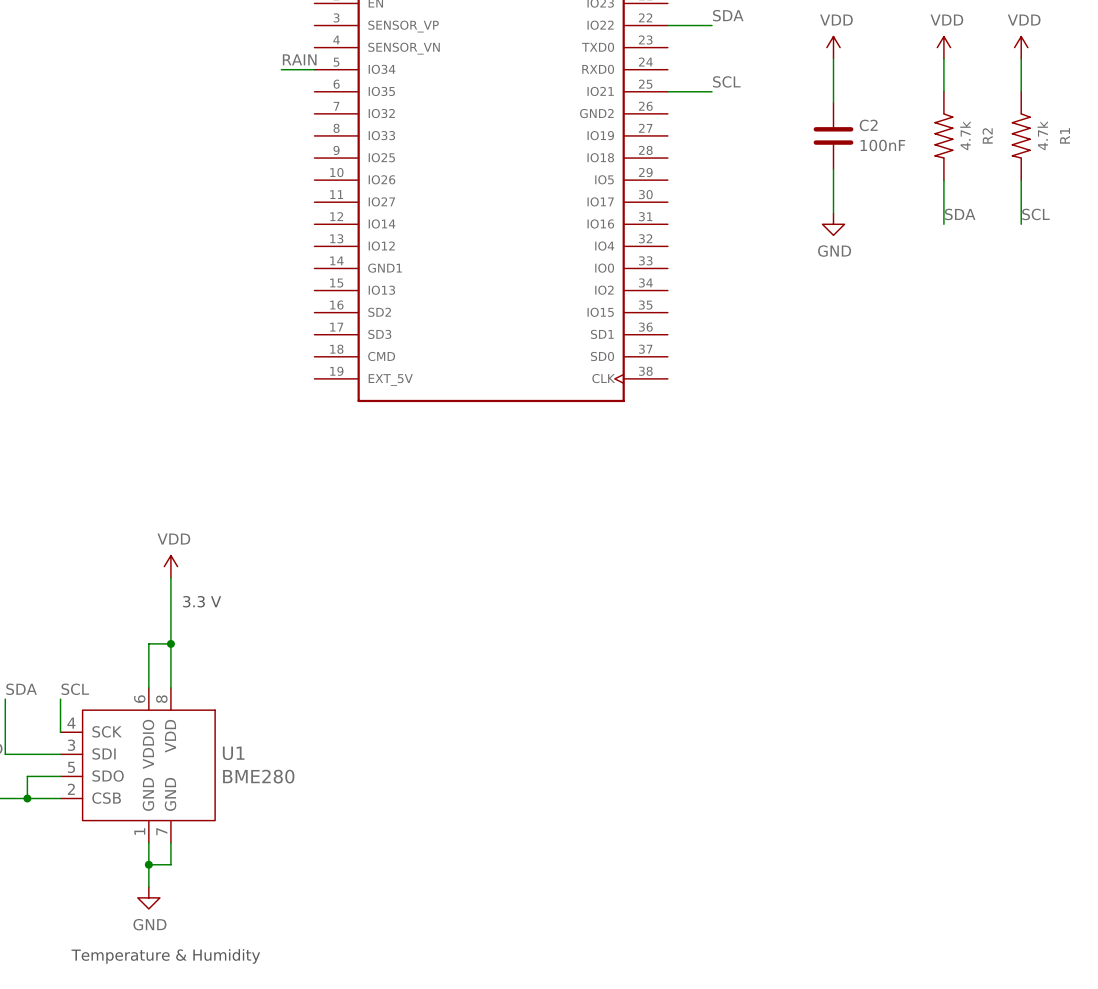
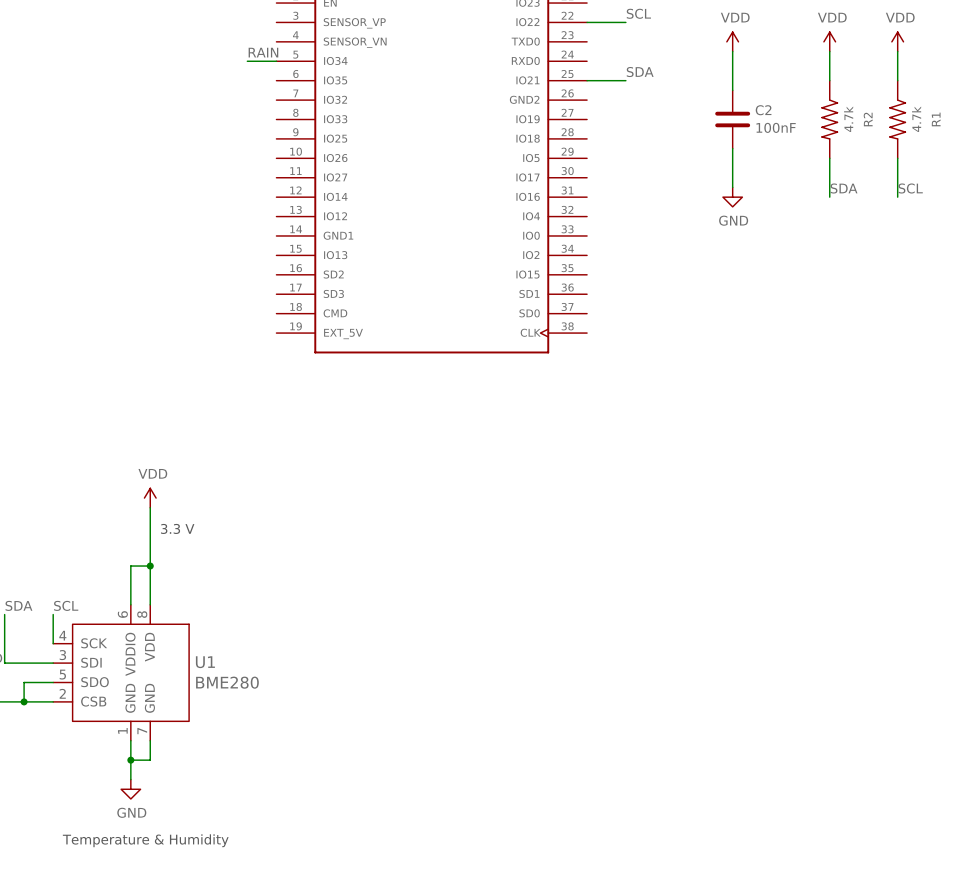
label: SDA (728, 15) -> SCL (638, 13)
label: SCL (726, 81) -> SDA (640, 72)

